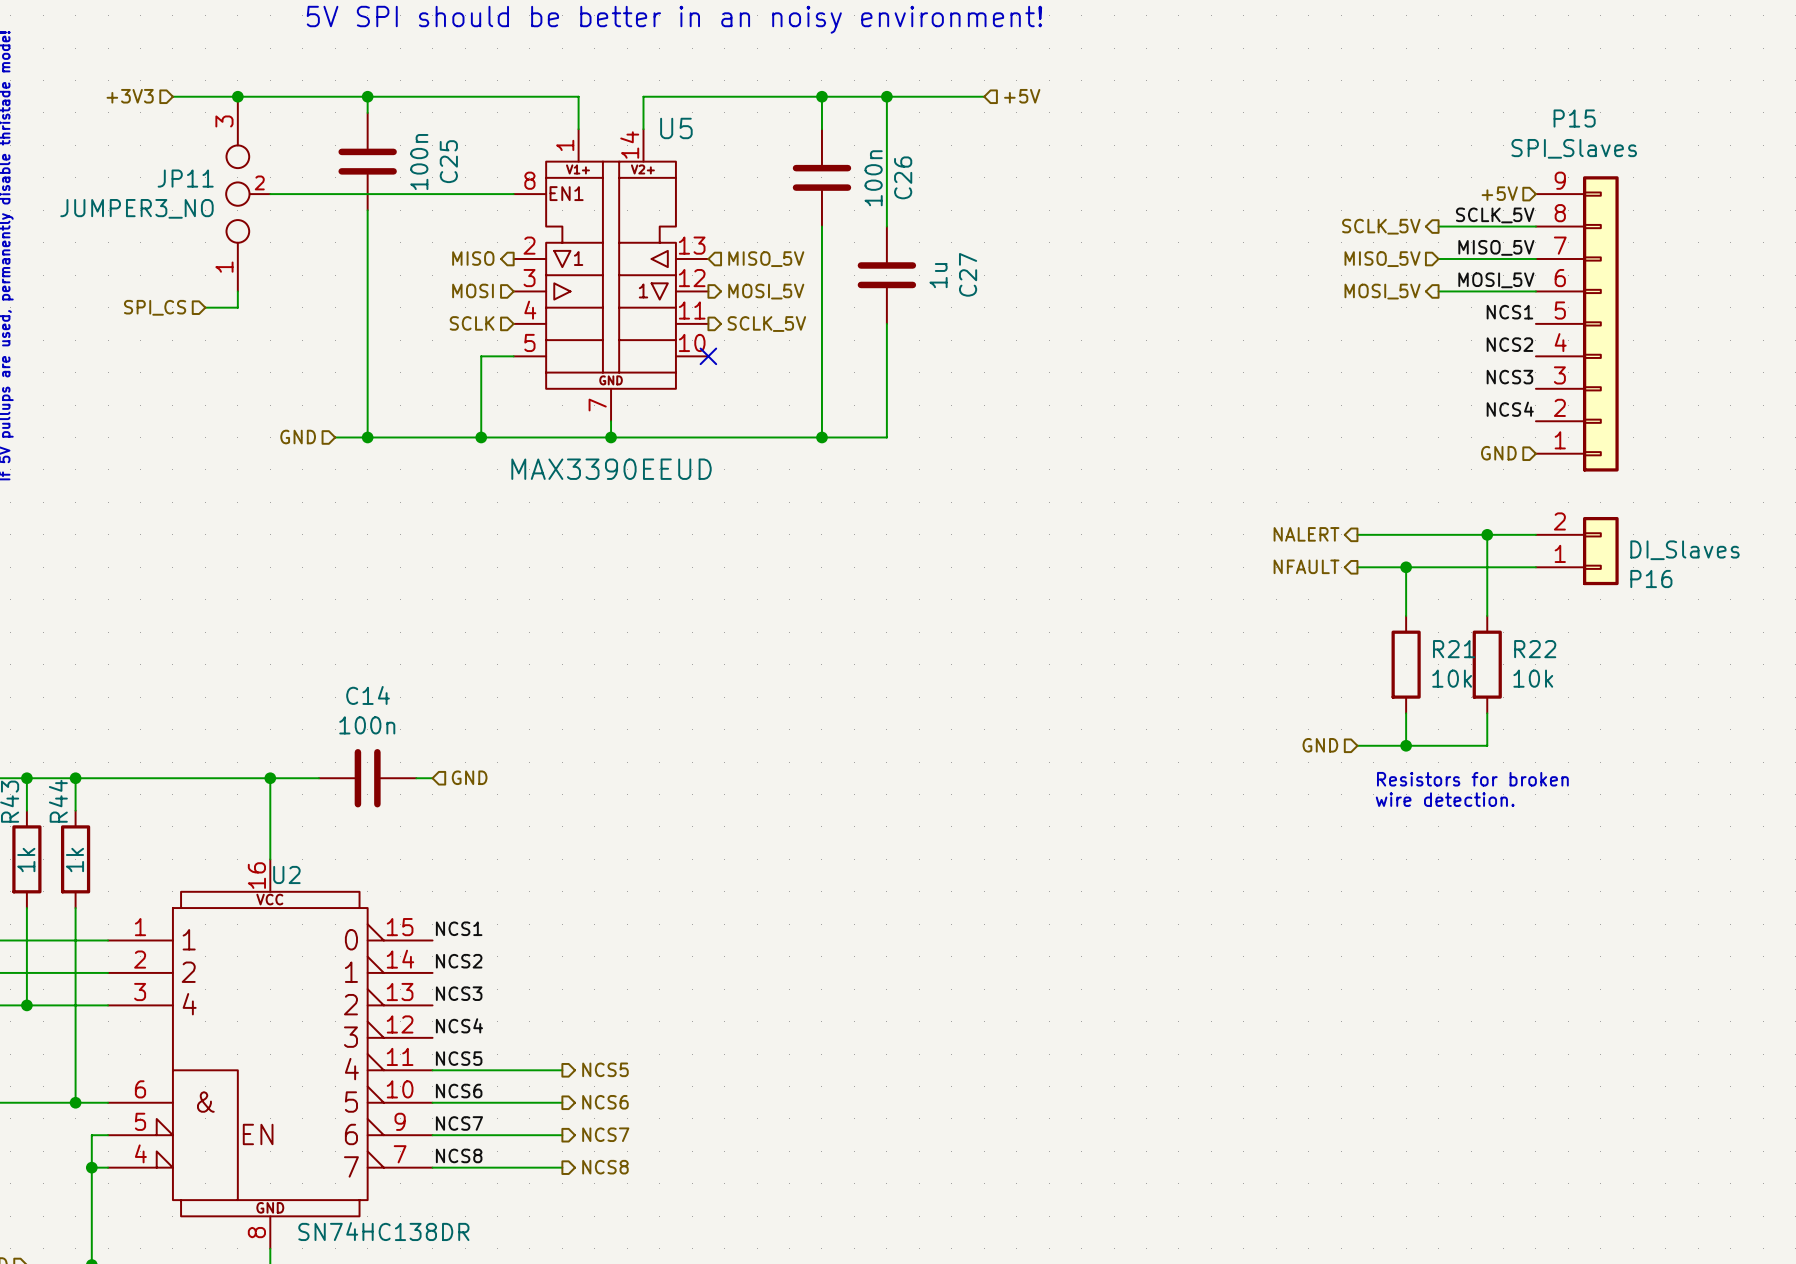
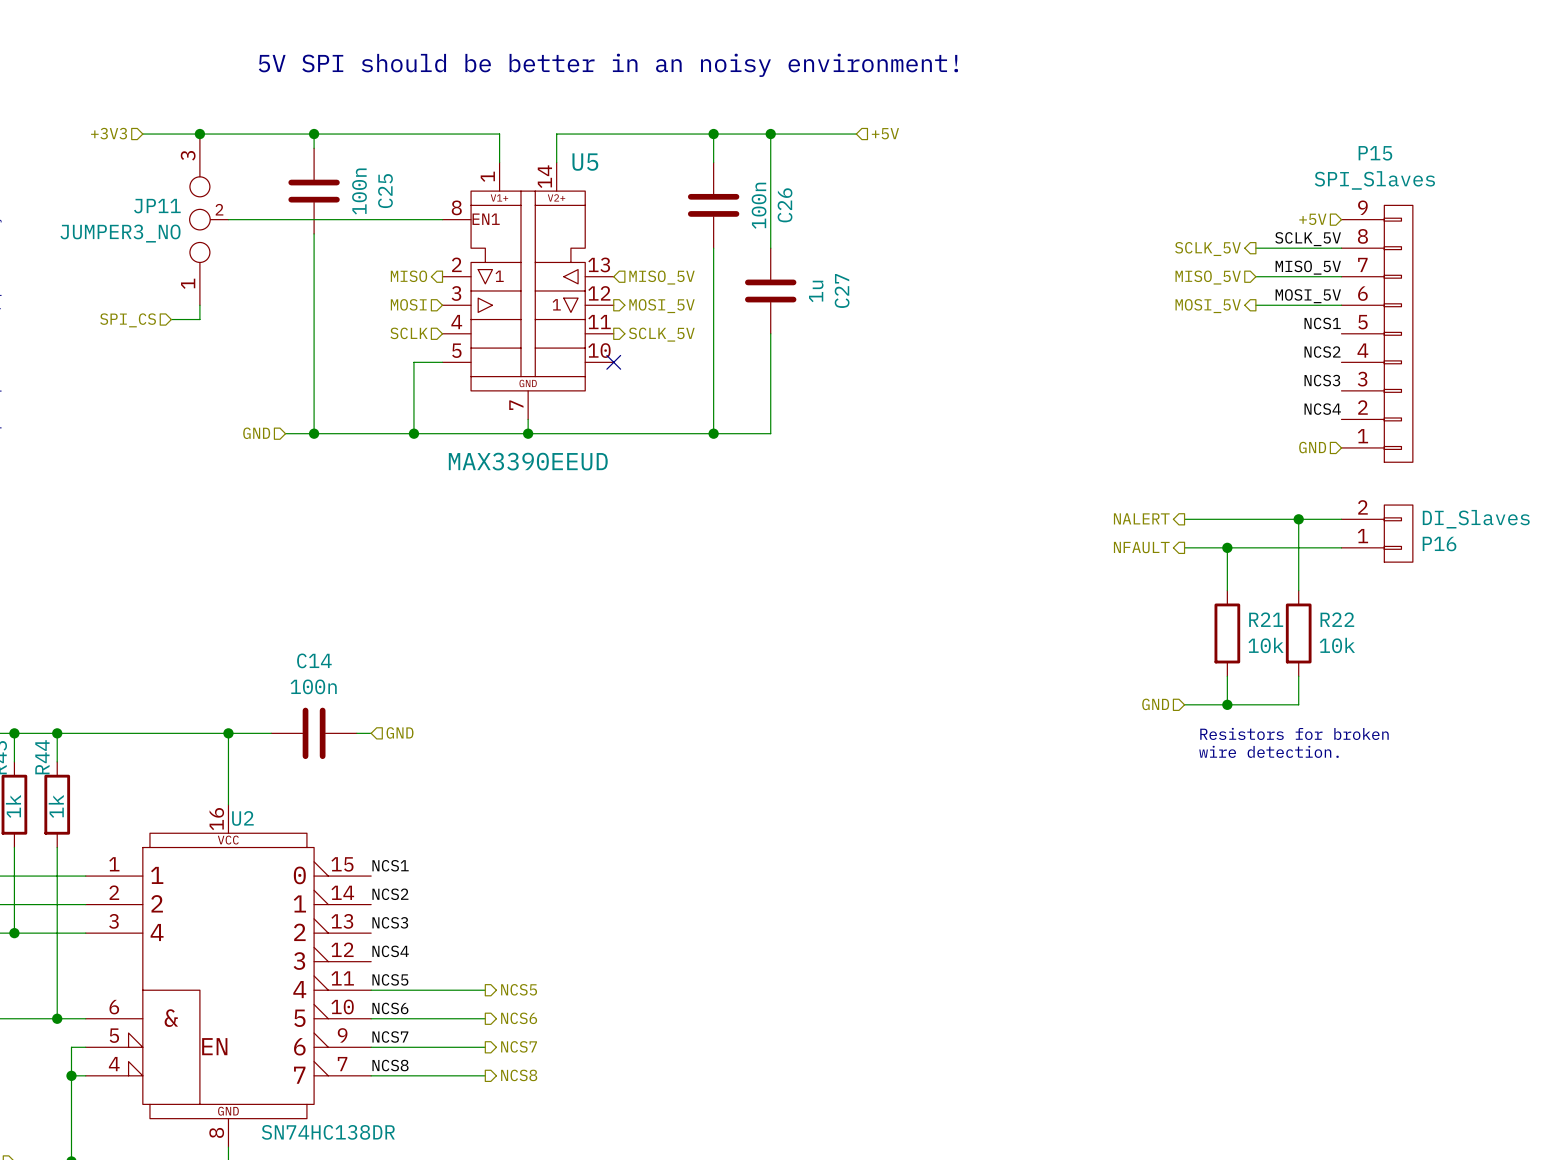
P15 symbol: [1535, 176, 1619, 472] -> [1341, 205, 1413, 463]
P16 symbol: [1535, 516, 1619, 586] -> [1341, 505, 1413, 563]

